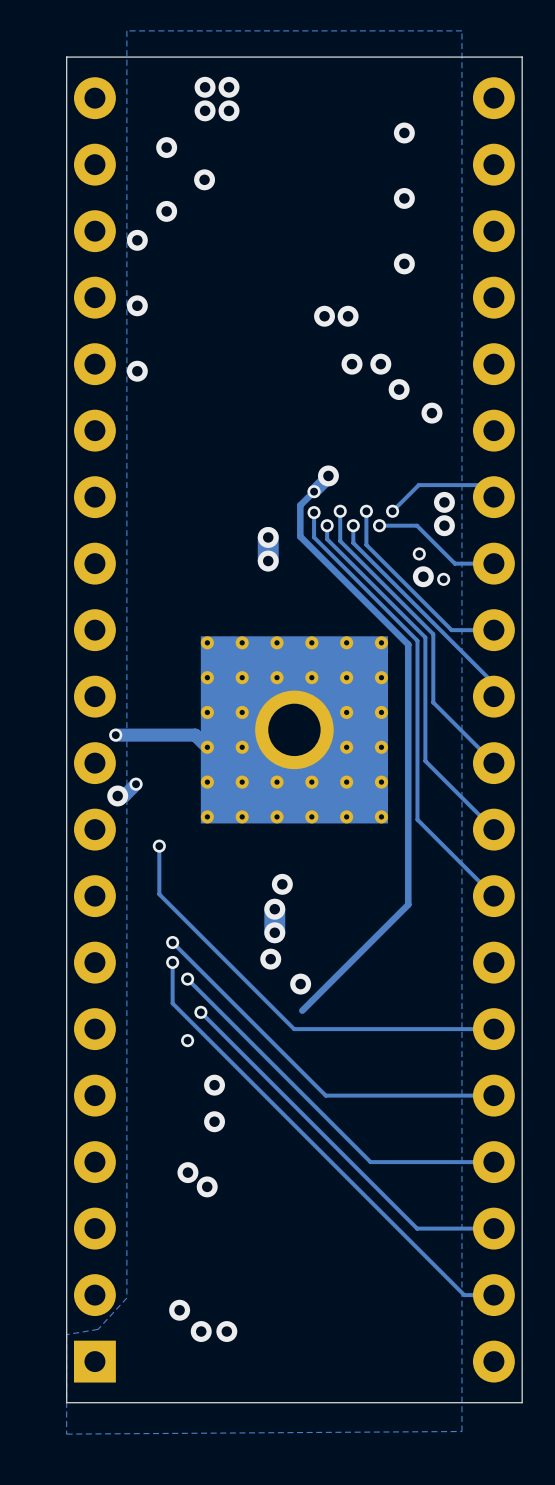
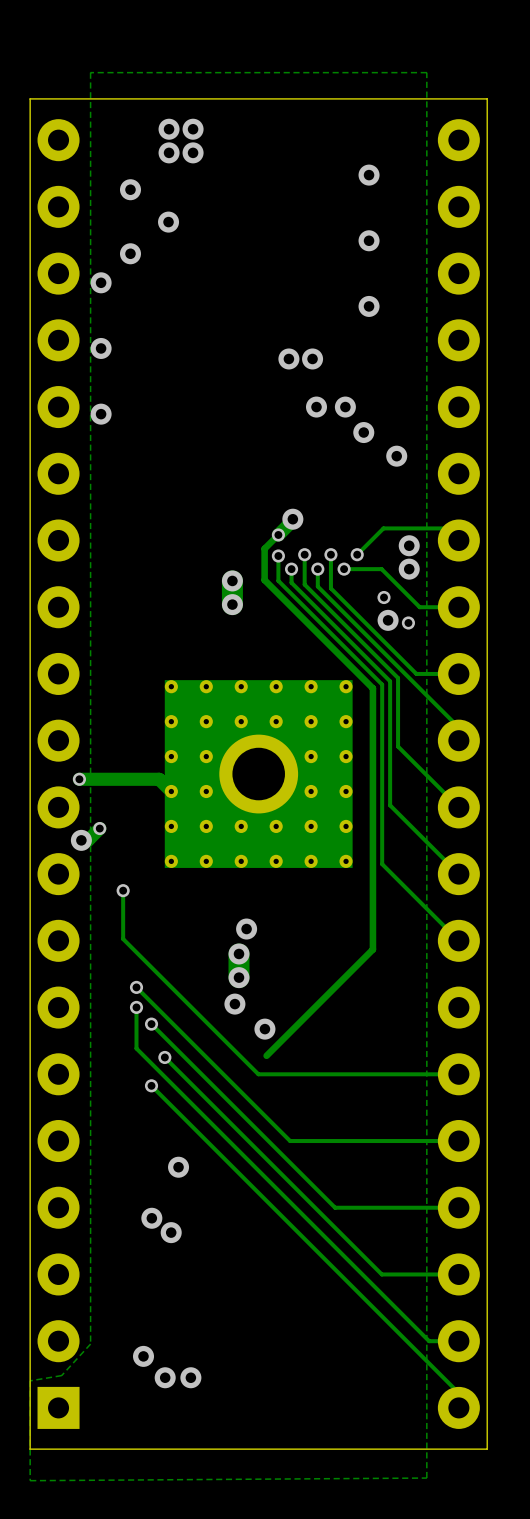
track: none -> (151, 1085) (458, 1393)
via: (214, 1085) -> none

